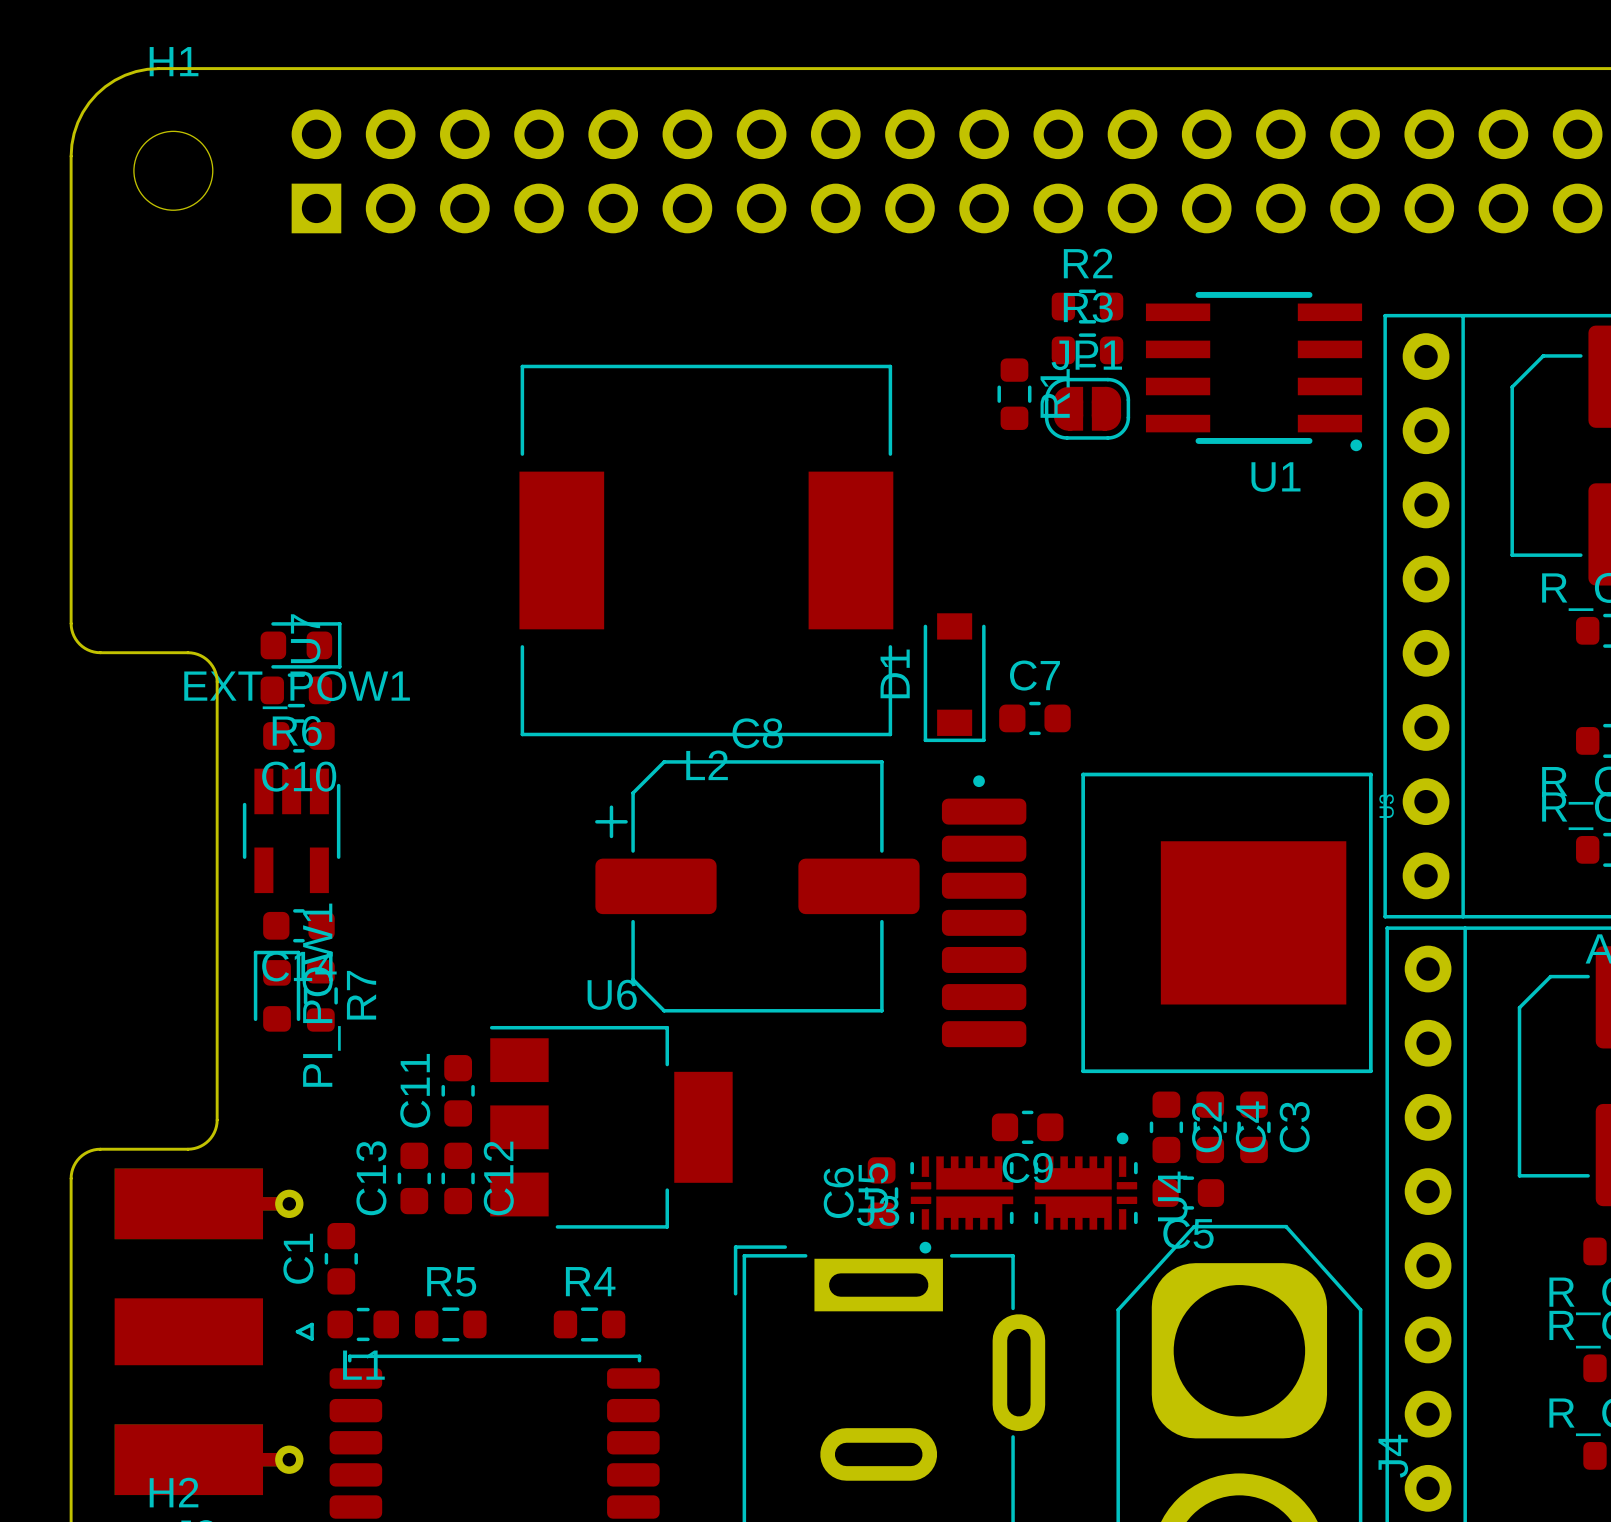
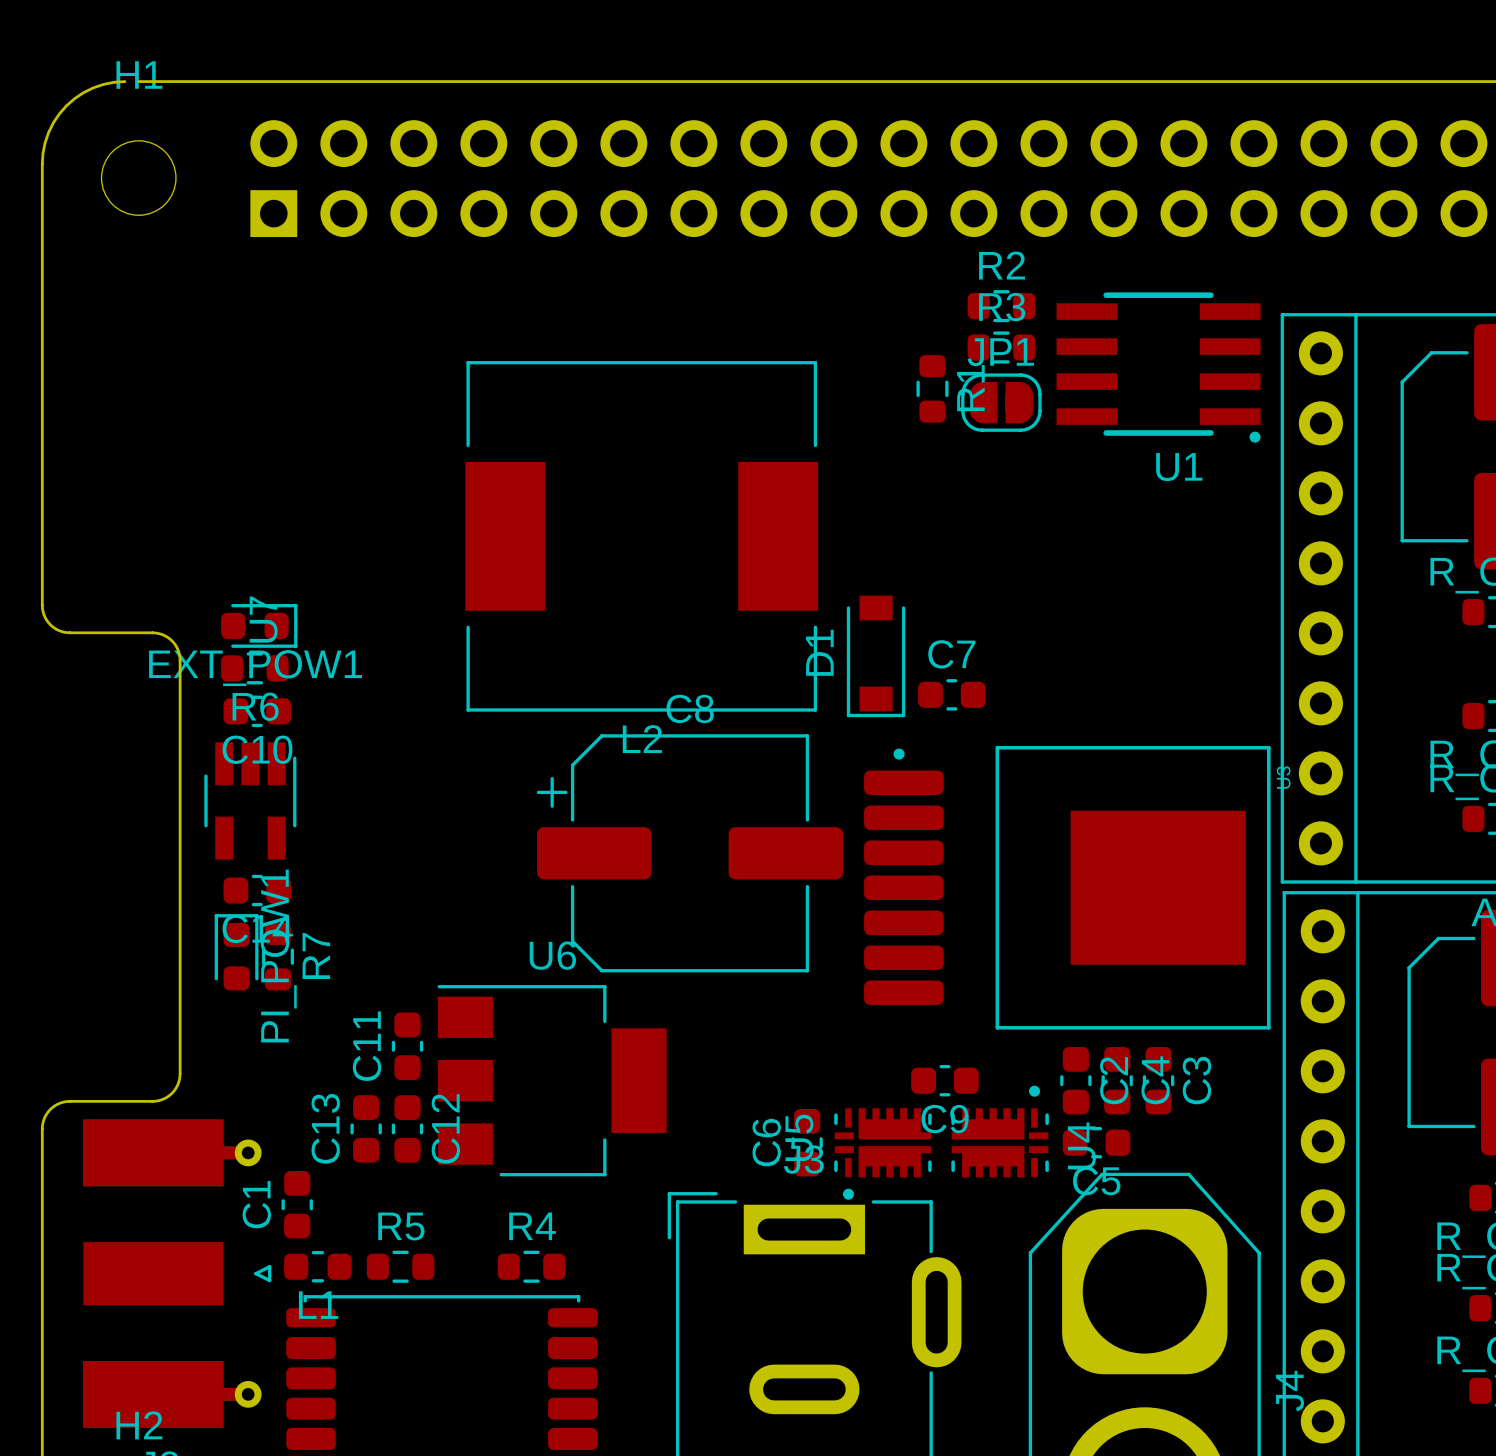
board edge: (158, 68) (173, 68) -> none

